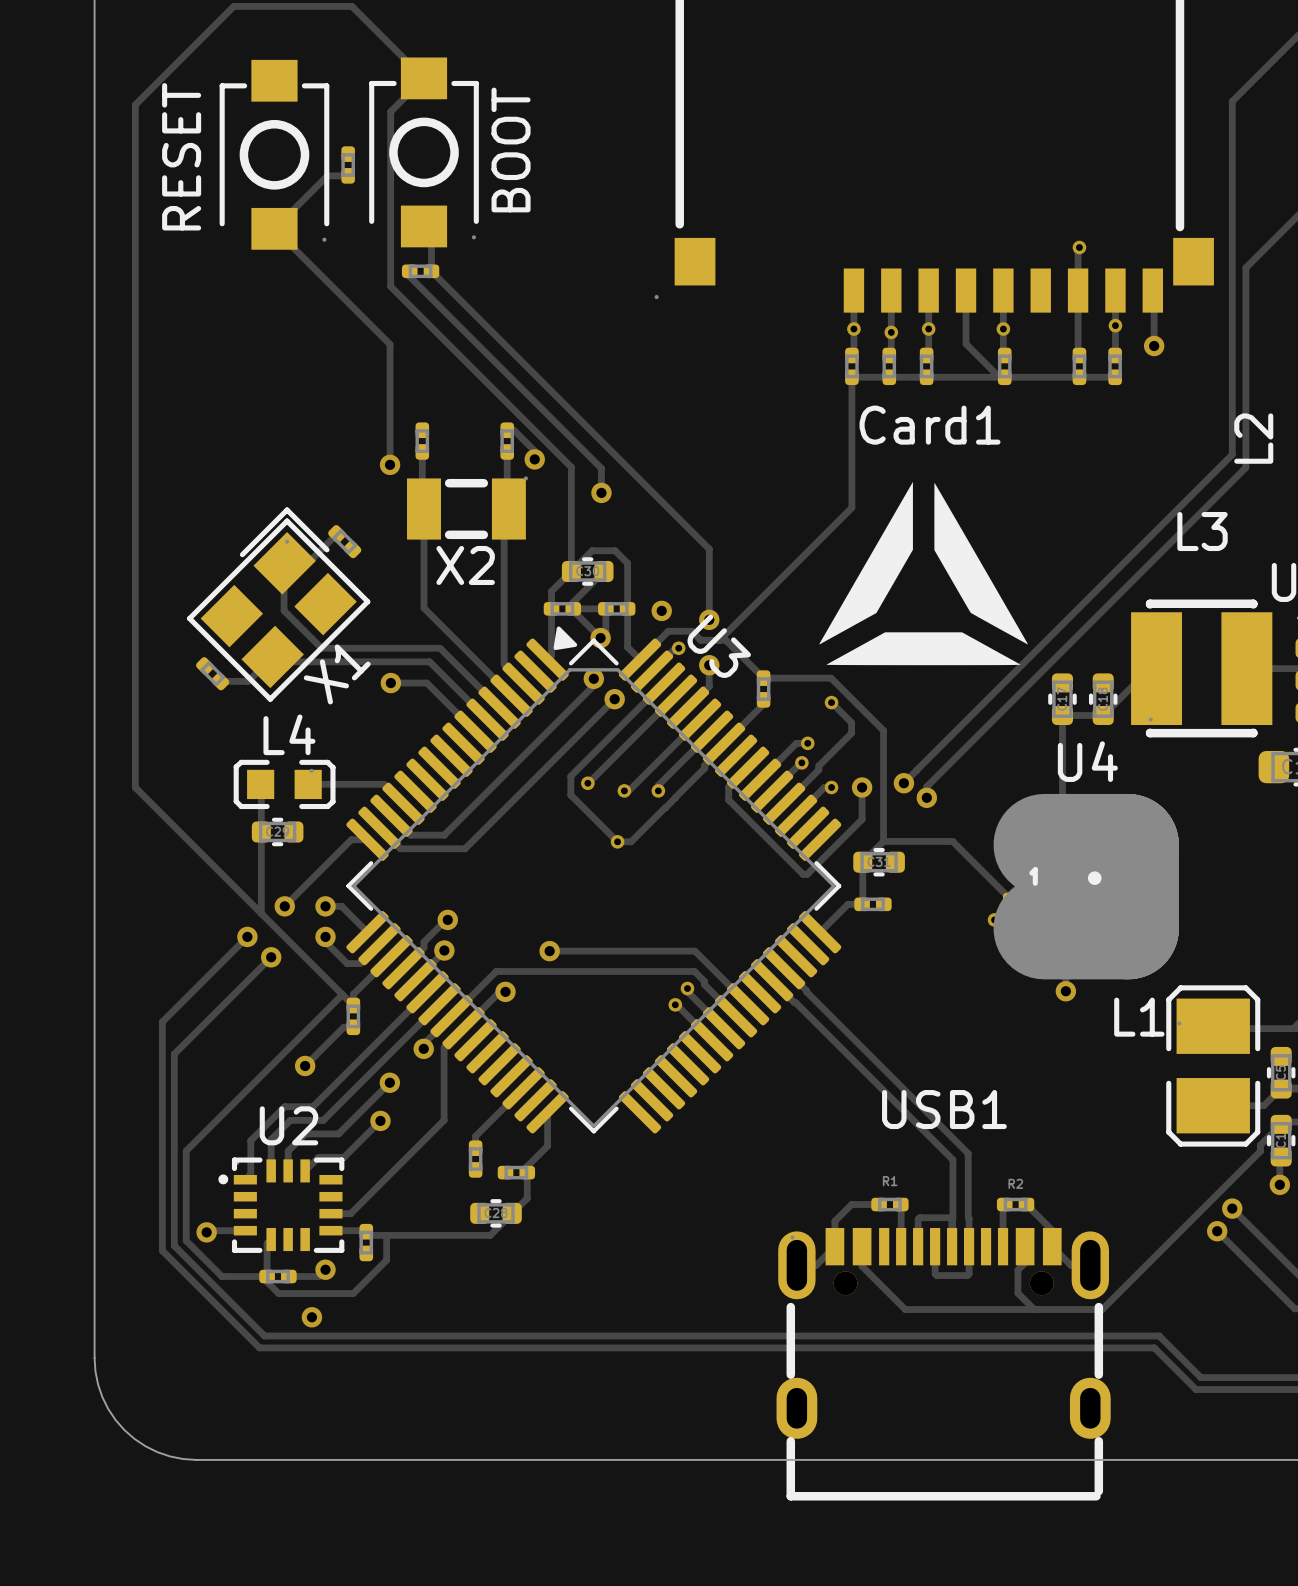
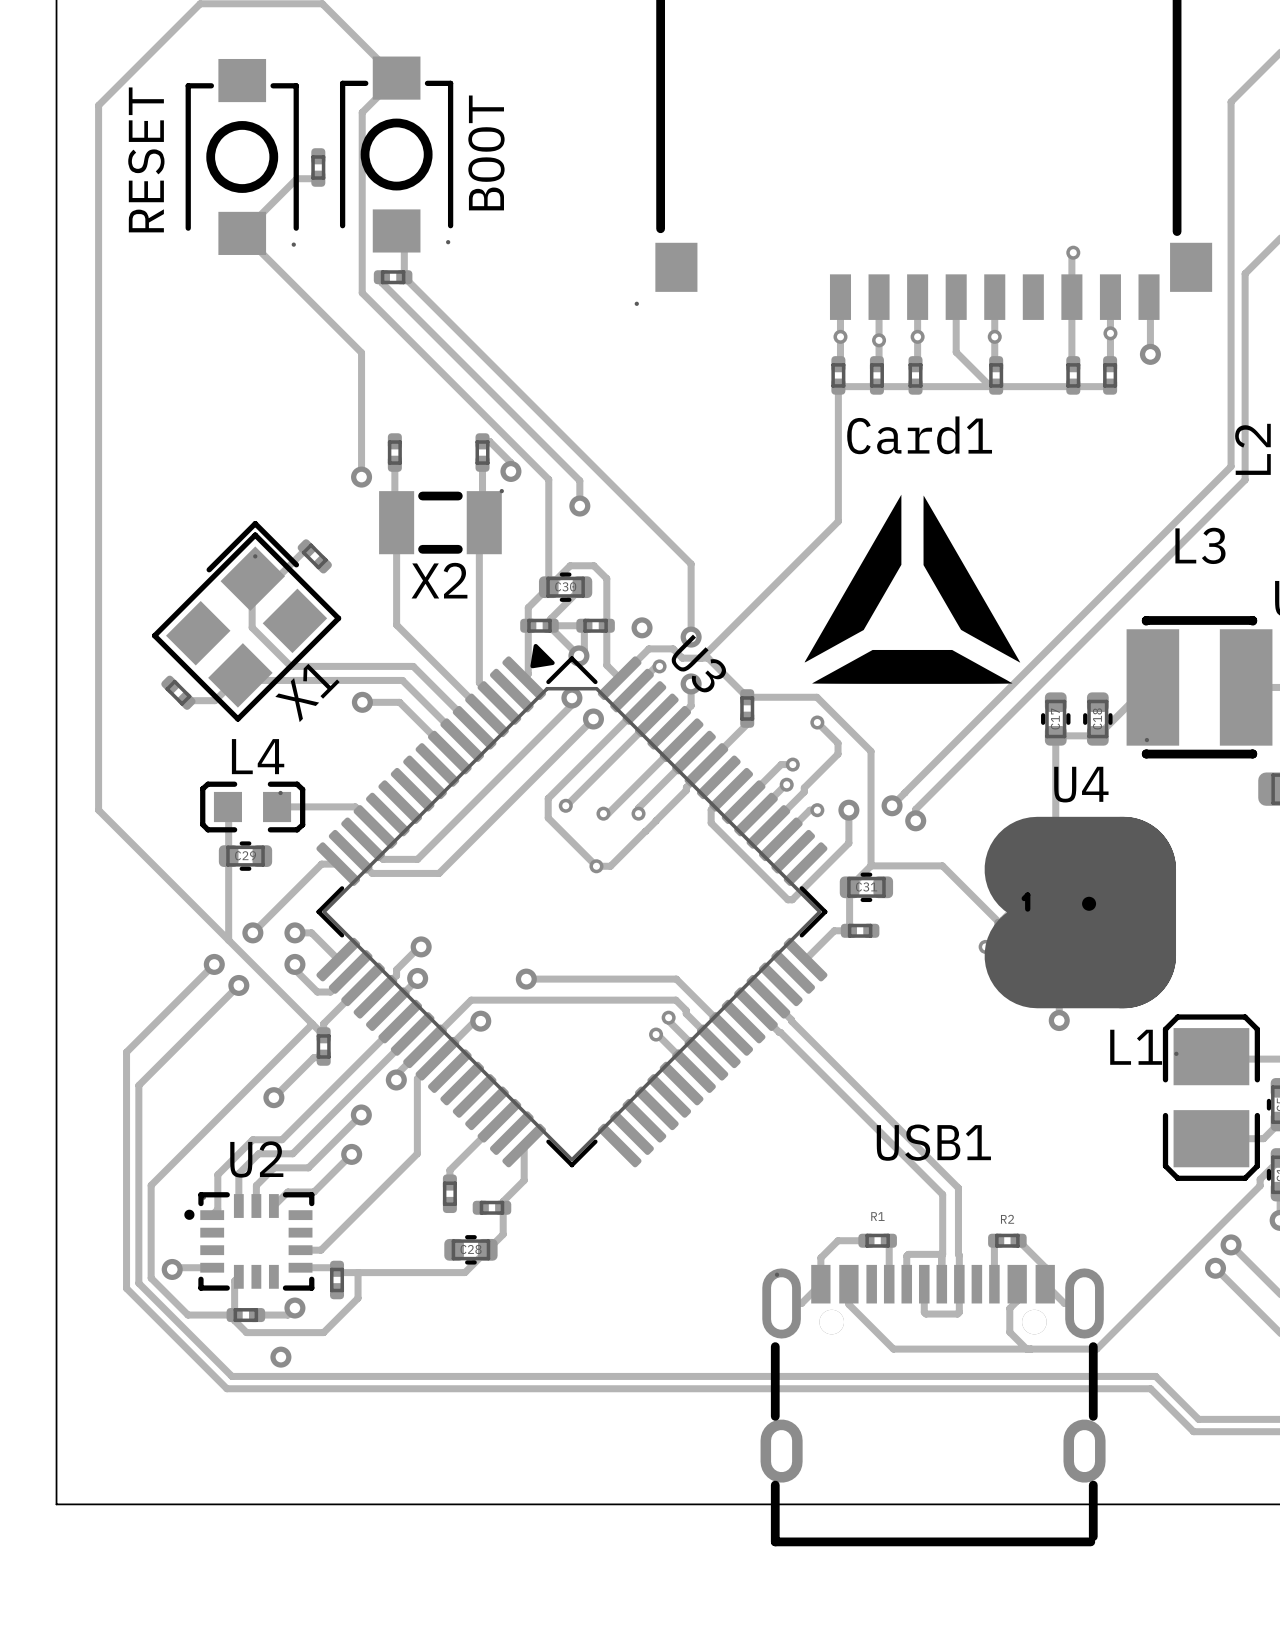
board edge: (94, 1358) (98, 1384) (102, 1397) (108, 1408) (124, 1430) (134, 1438) (157, 1452) (170, 1456) (196, 1459) -> (56, 1399) (56, 1504) (161, 1504)

